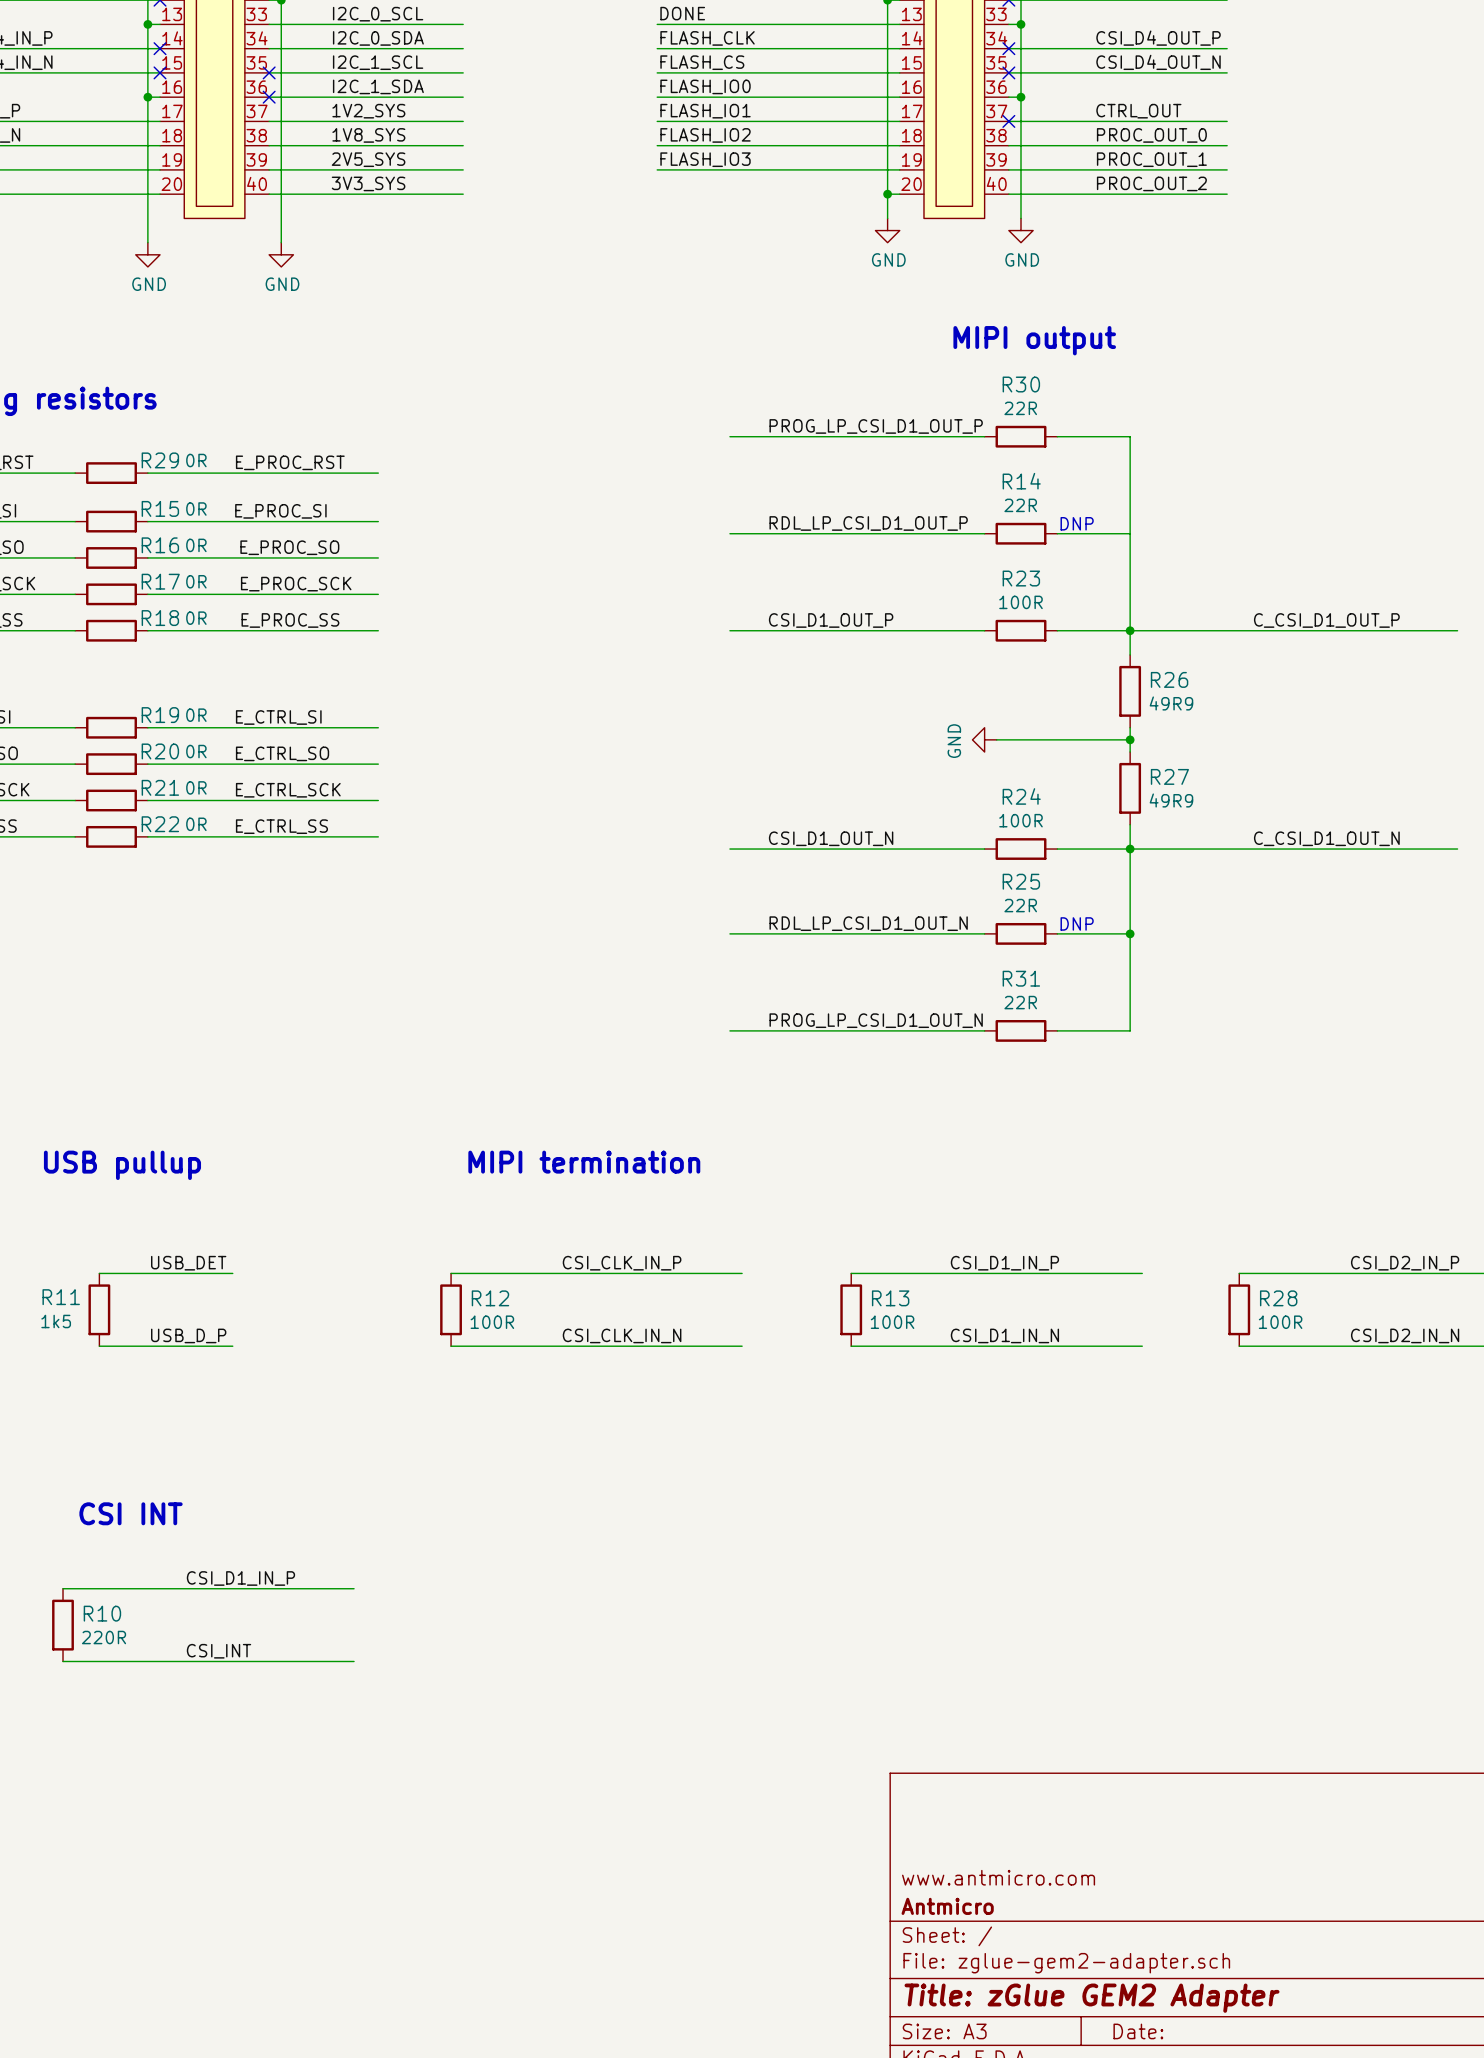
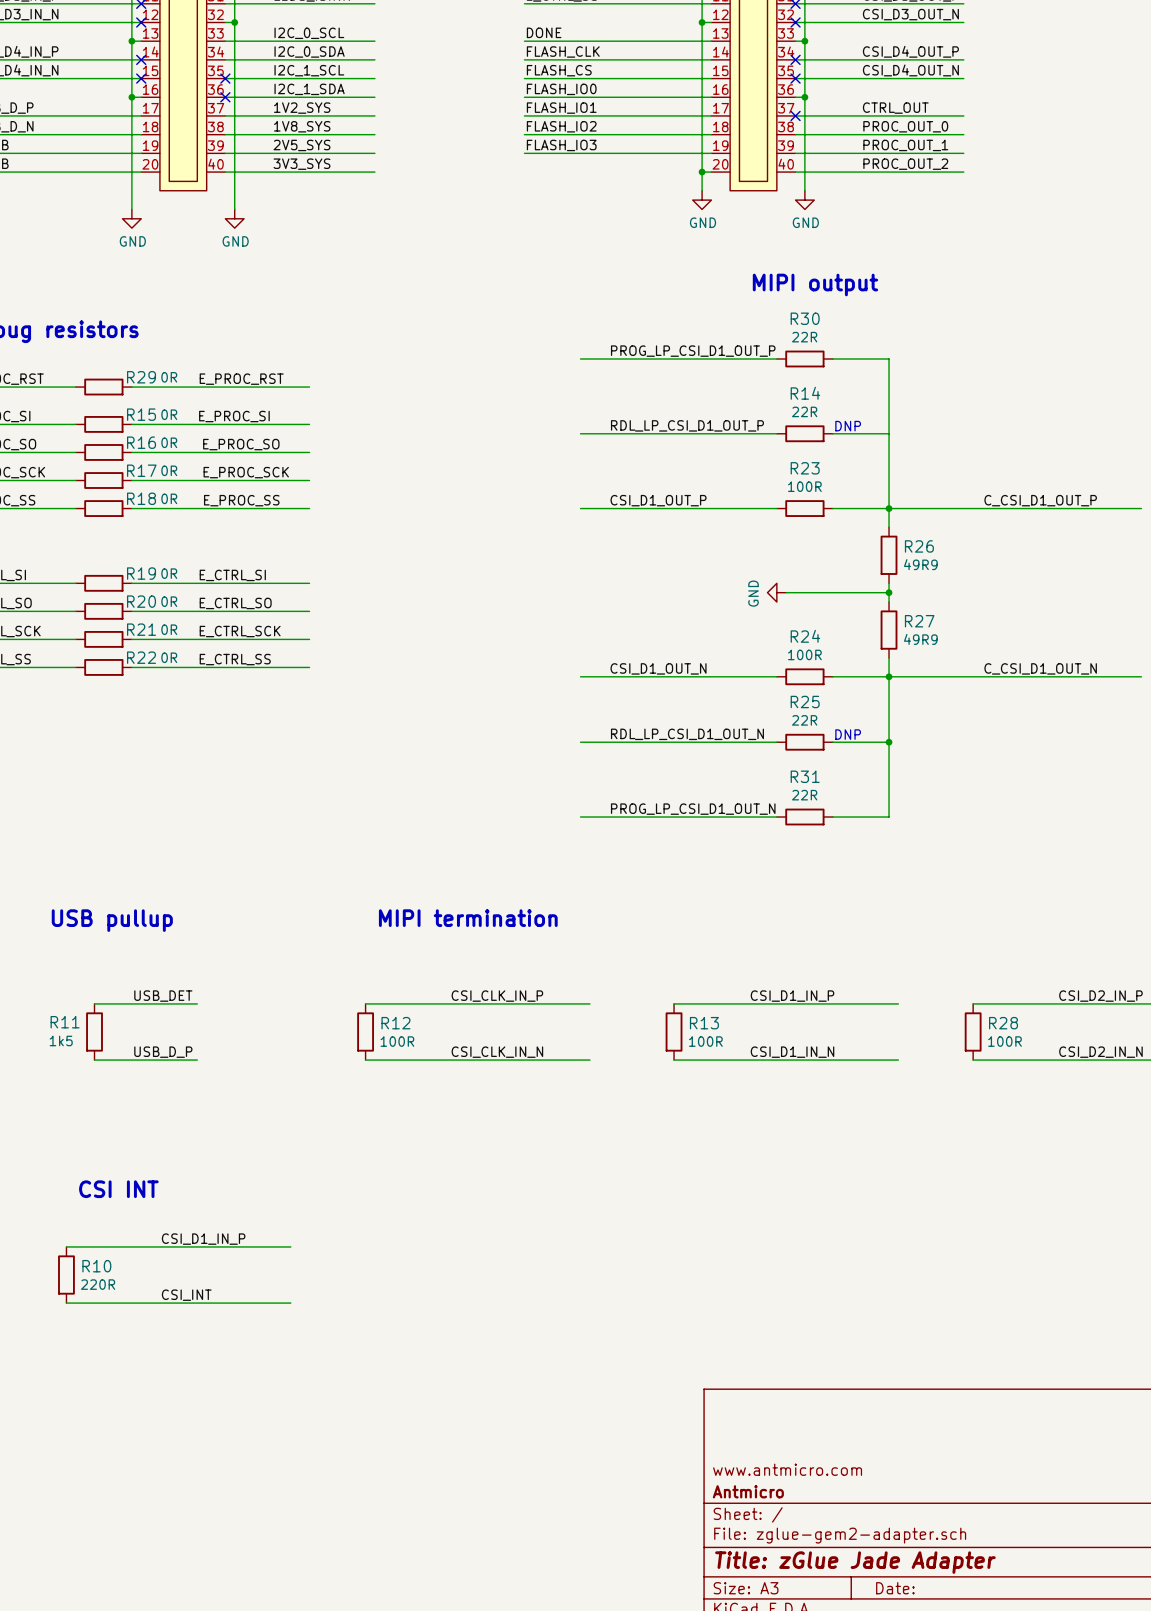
title block: Title: zGlue GEM2 Adapter (1092, 1998) -> Title: zGlue Jade Adapter (855, 1562)

